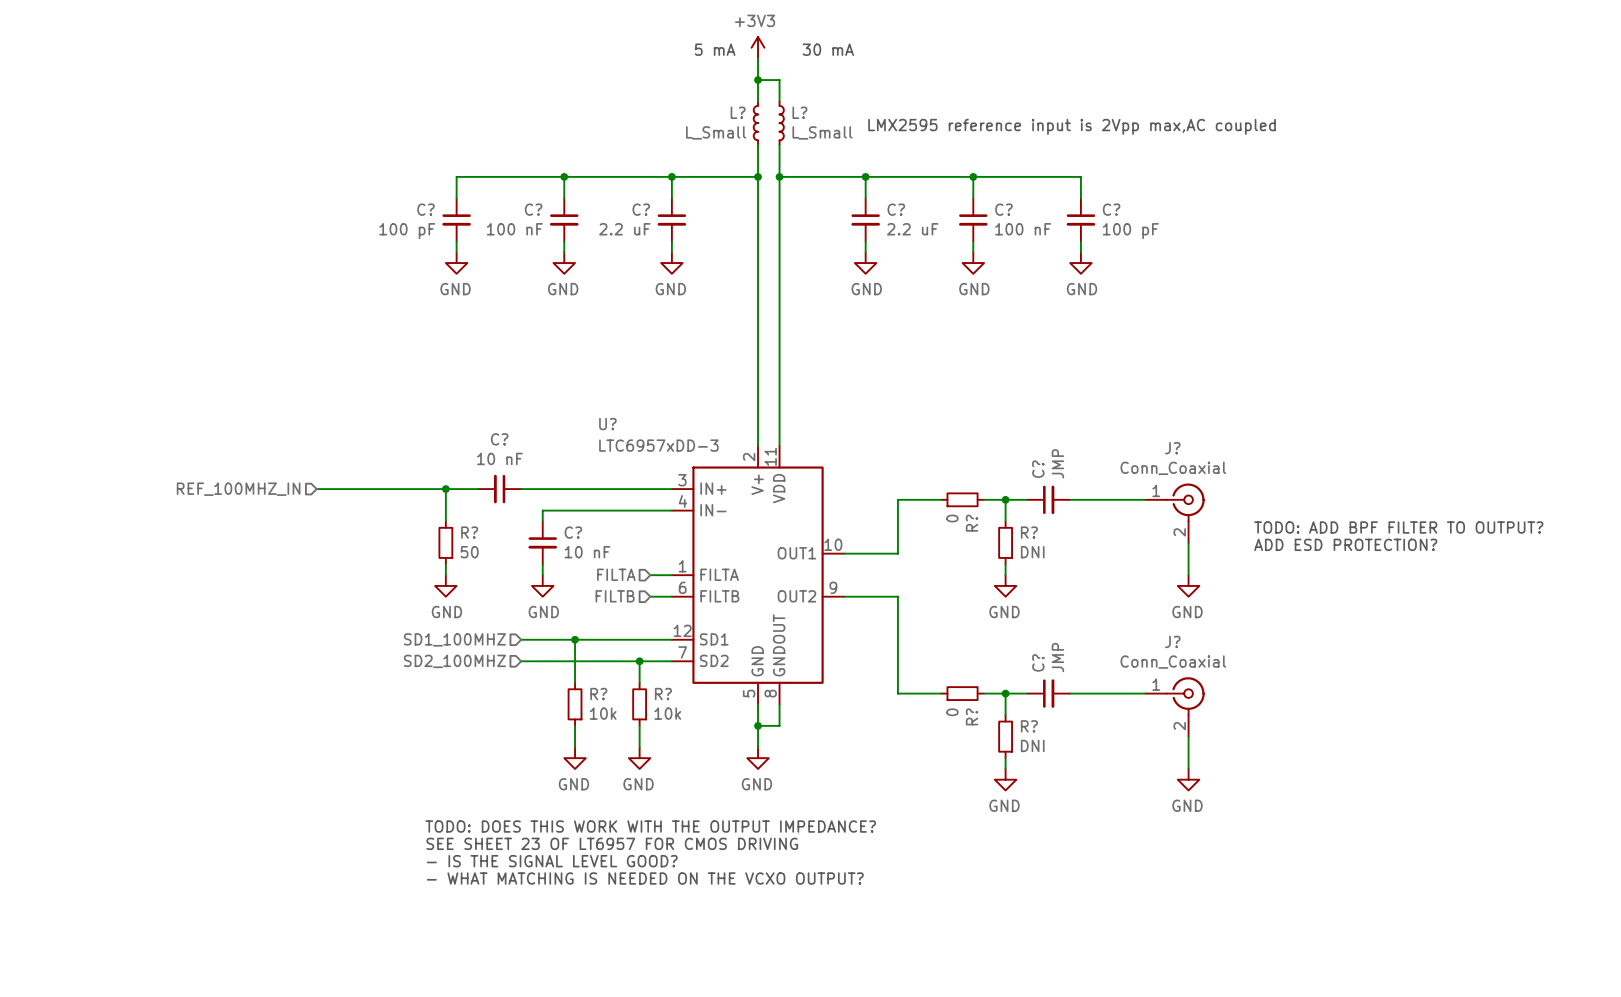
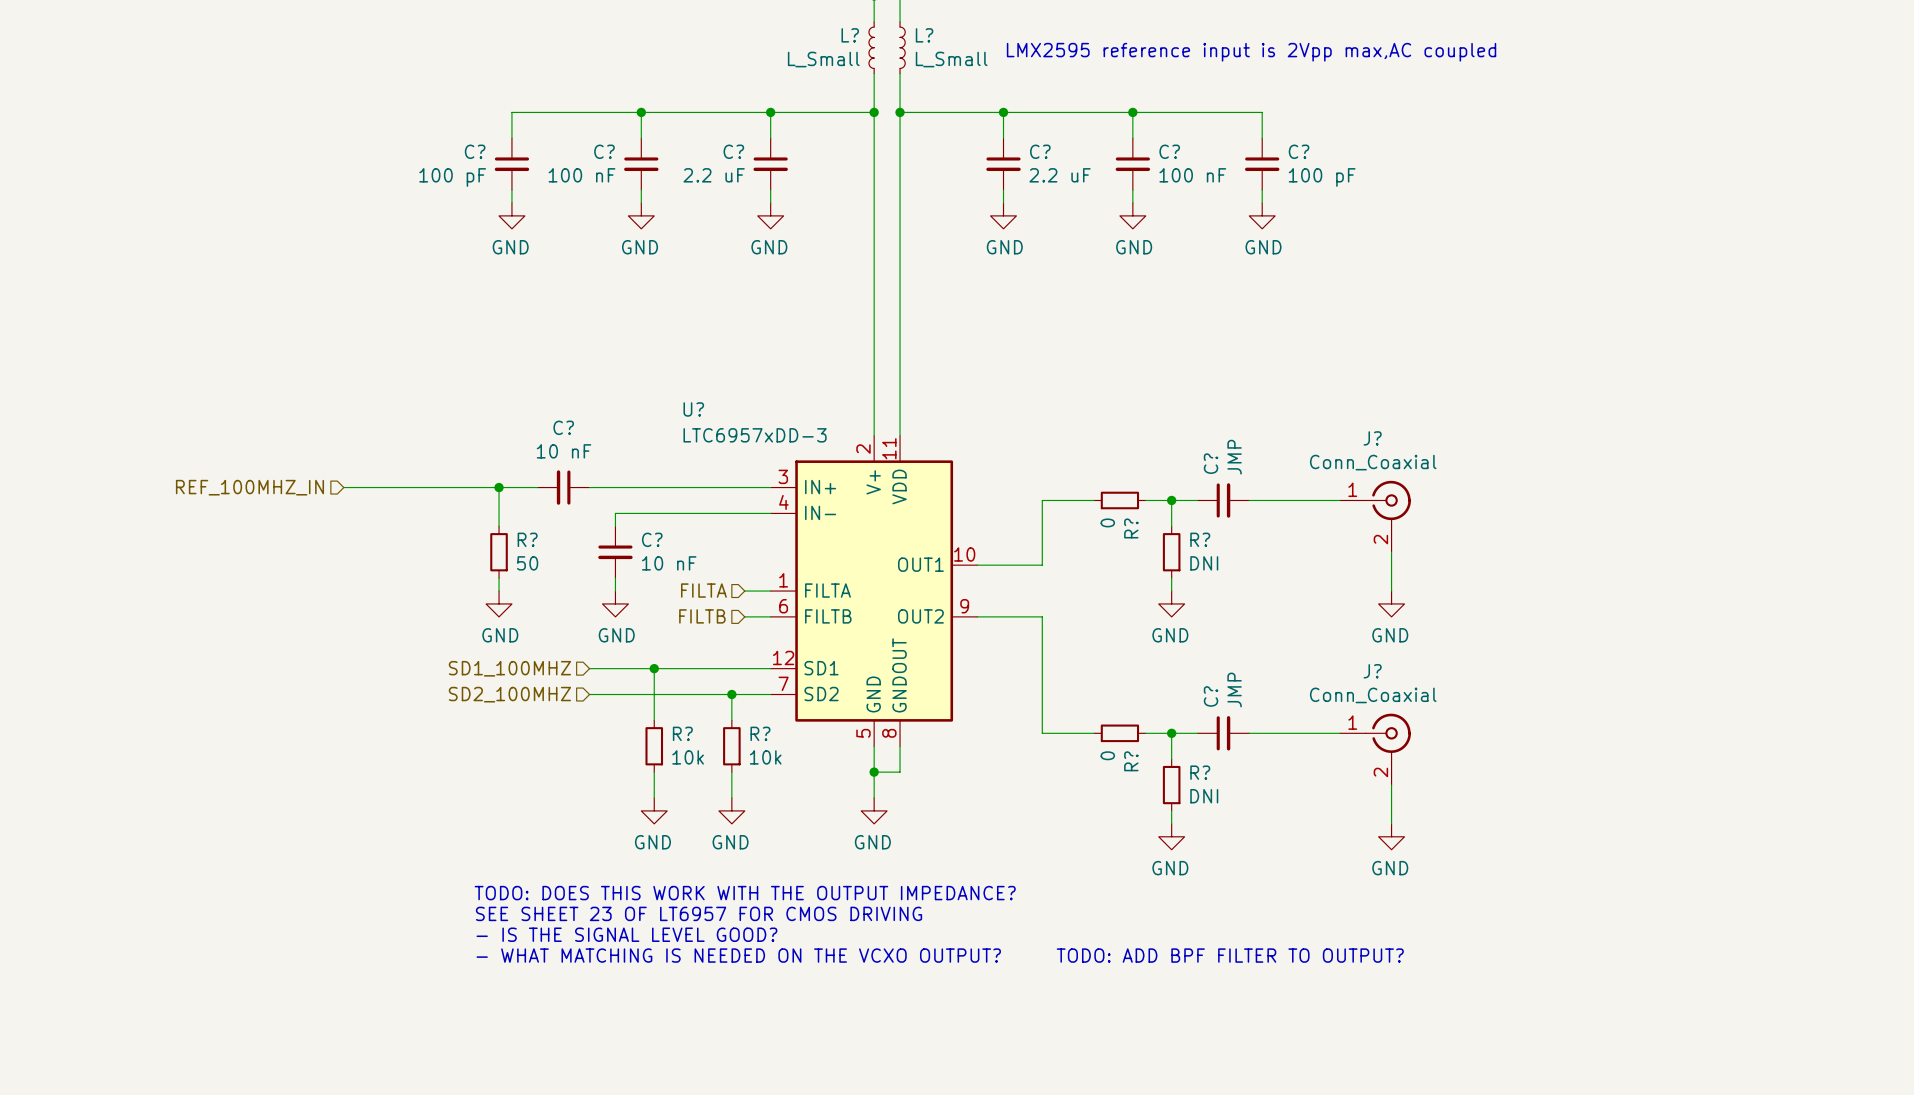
text: TODO: ADD BPF FILTER TO OUTPUT? (1398, 527) -> none
text: ADD ESD PROTECTION? (1345, 544) -> none
text: none -> TODO: ADD BPF FILTER TO OUTPUT? (1230, 955)

